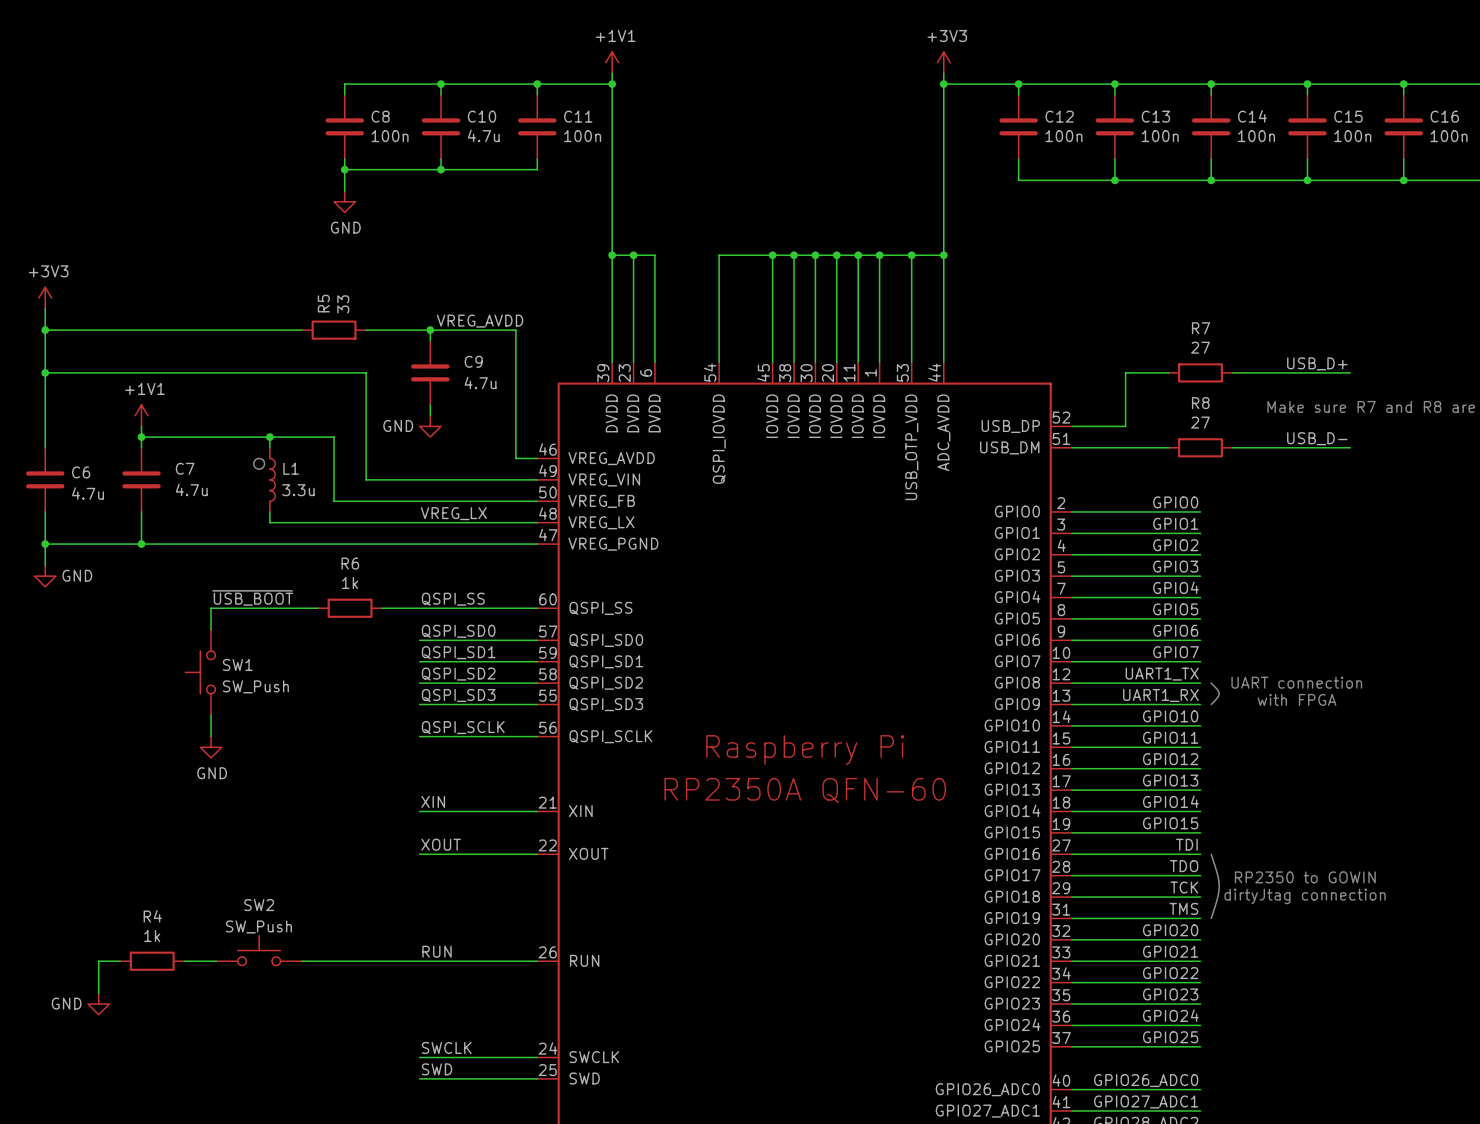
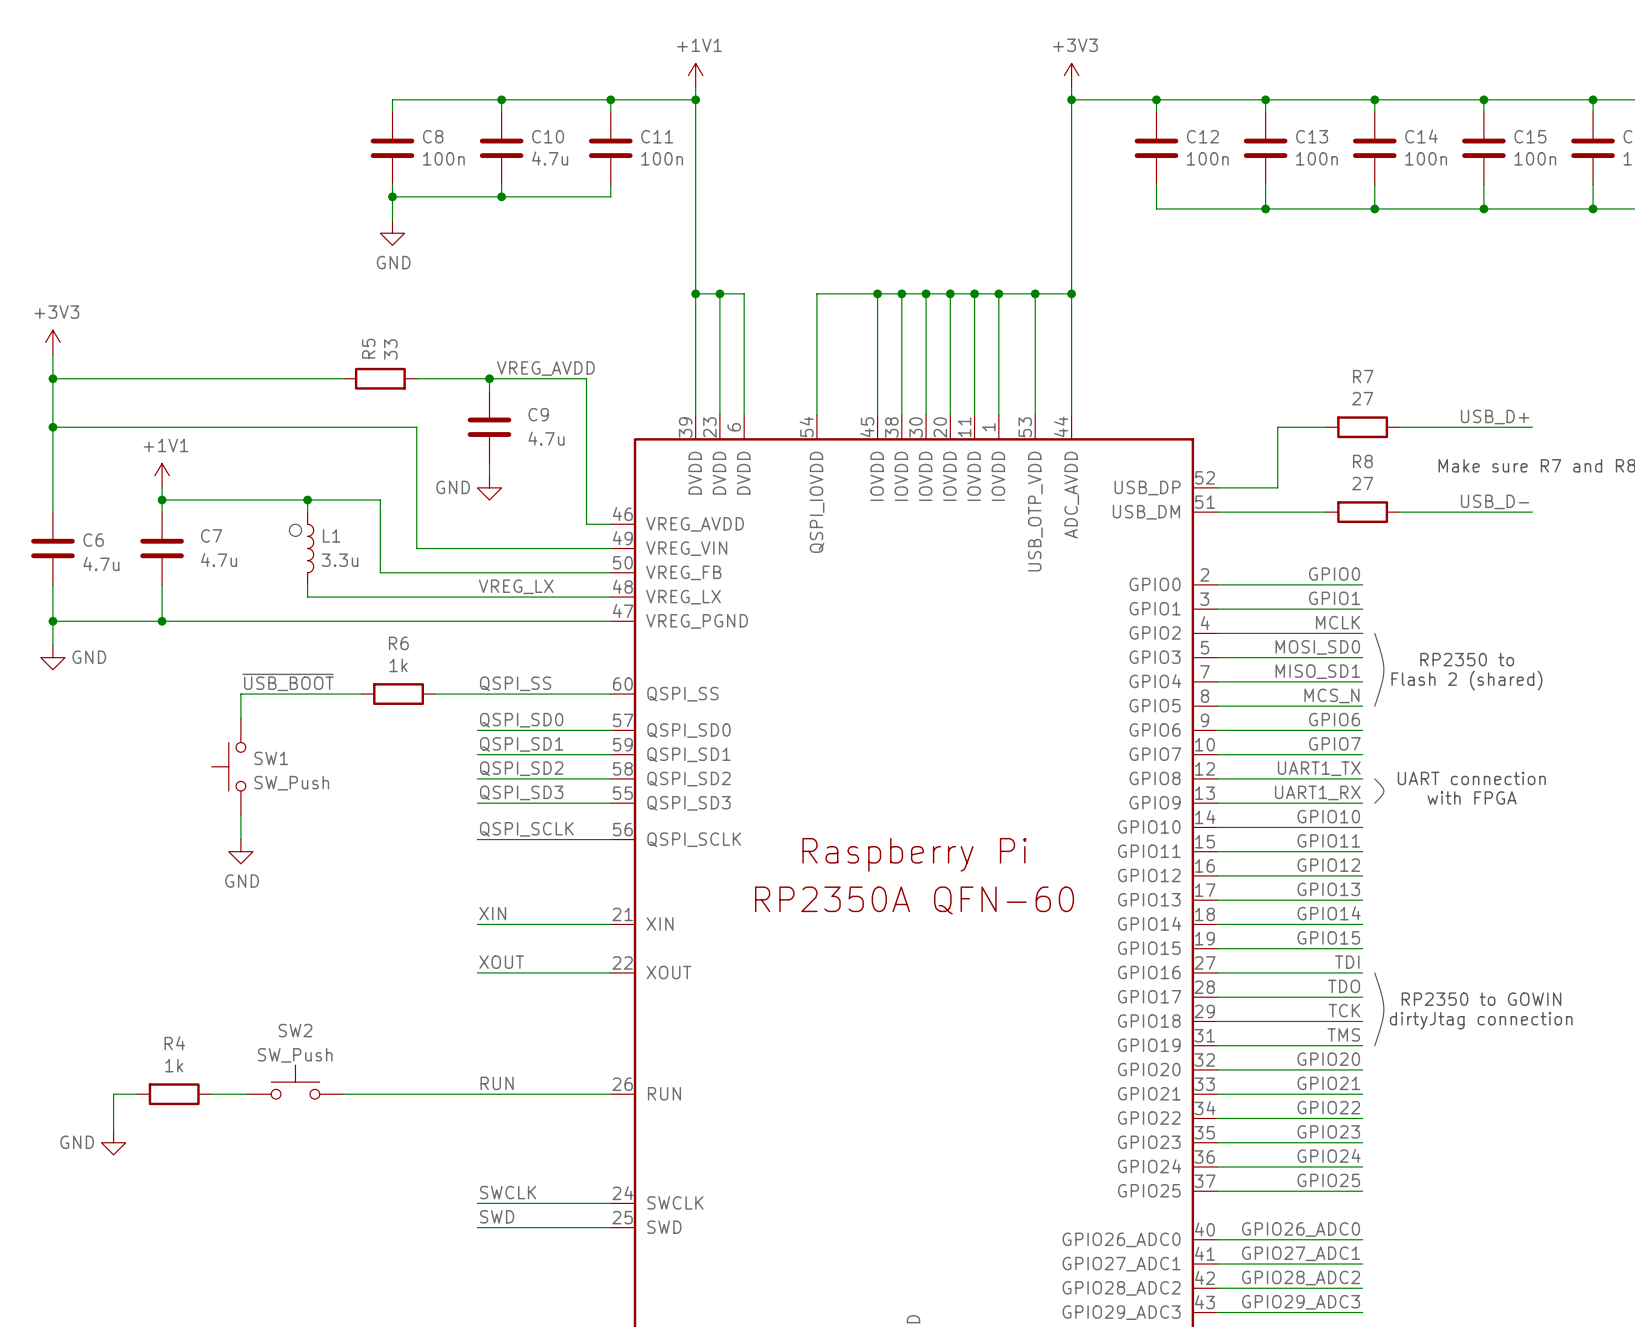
label: GPIO2 (1175, 545) -> MCLK (1338, 622)
line: none -> (1374, 633) (1383, 669) (1374, 706)
label: GPIO3 (1175, 566) -> MOSI_SD0 (1317, 647)
text: none -> RP2350 to (1467, 659)
label: GPIO4 (1175, 587) -> MISO_SD1 (1317, 671)
text: none -> Flash 2 (shared) (1466, 680)
label: GPIO5 (1175, 609) -> MCS_N (1331, 695)

